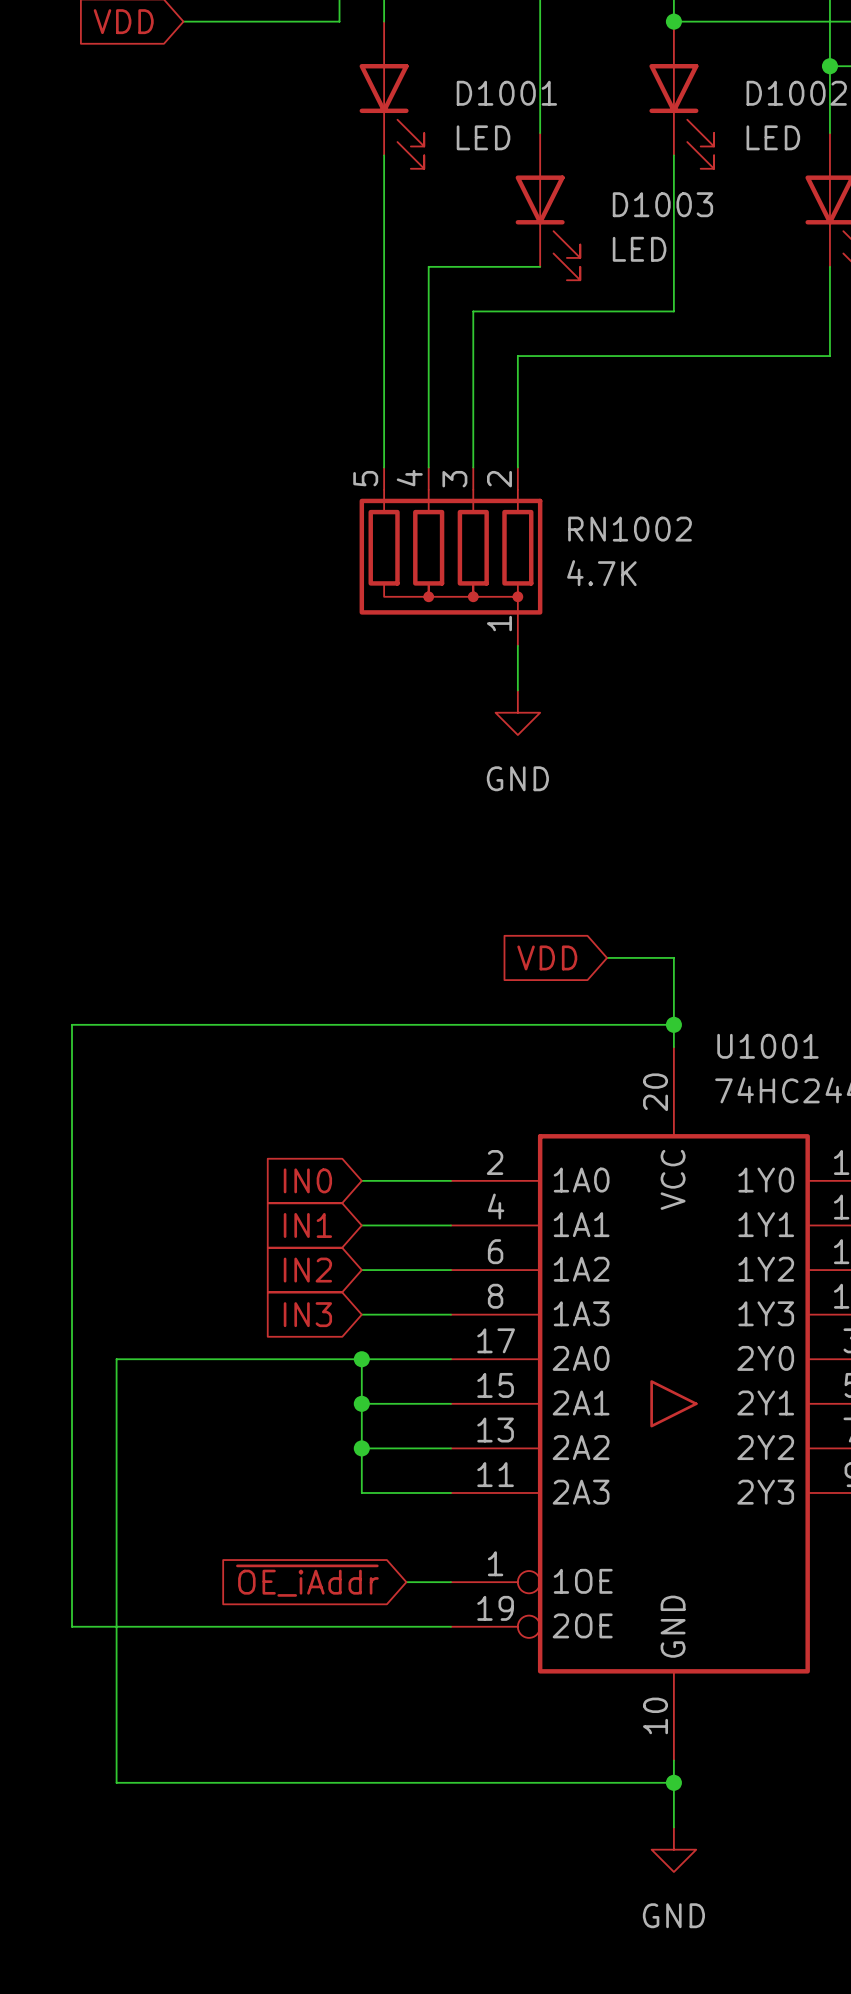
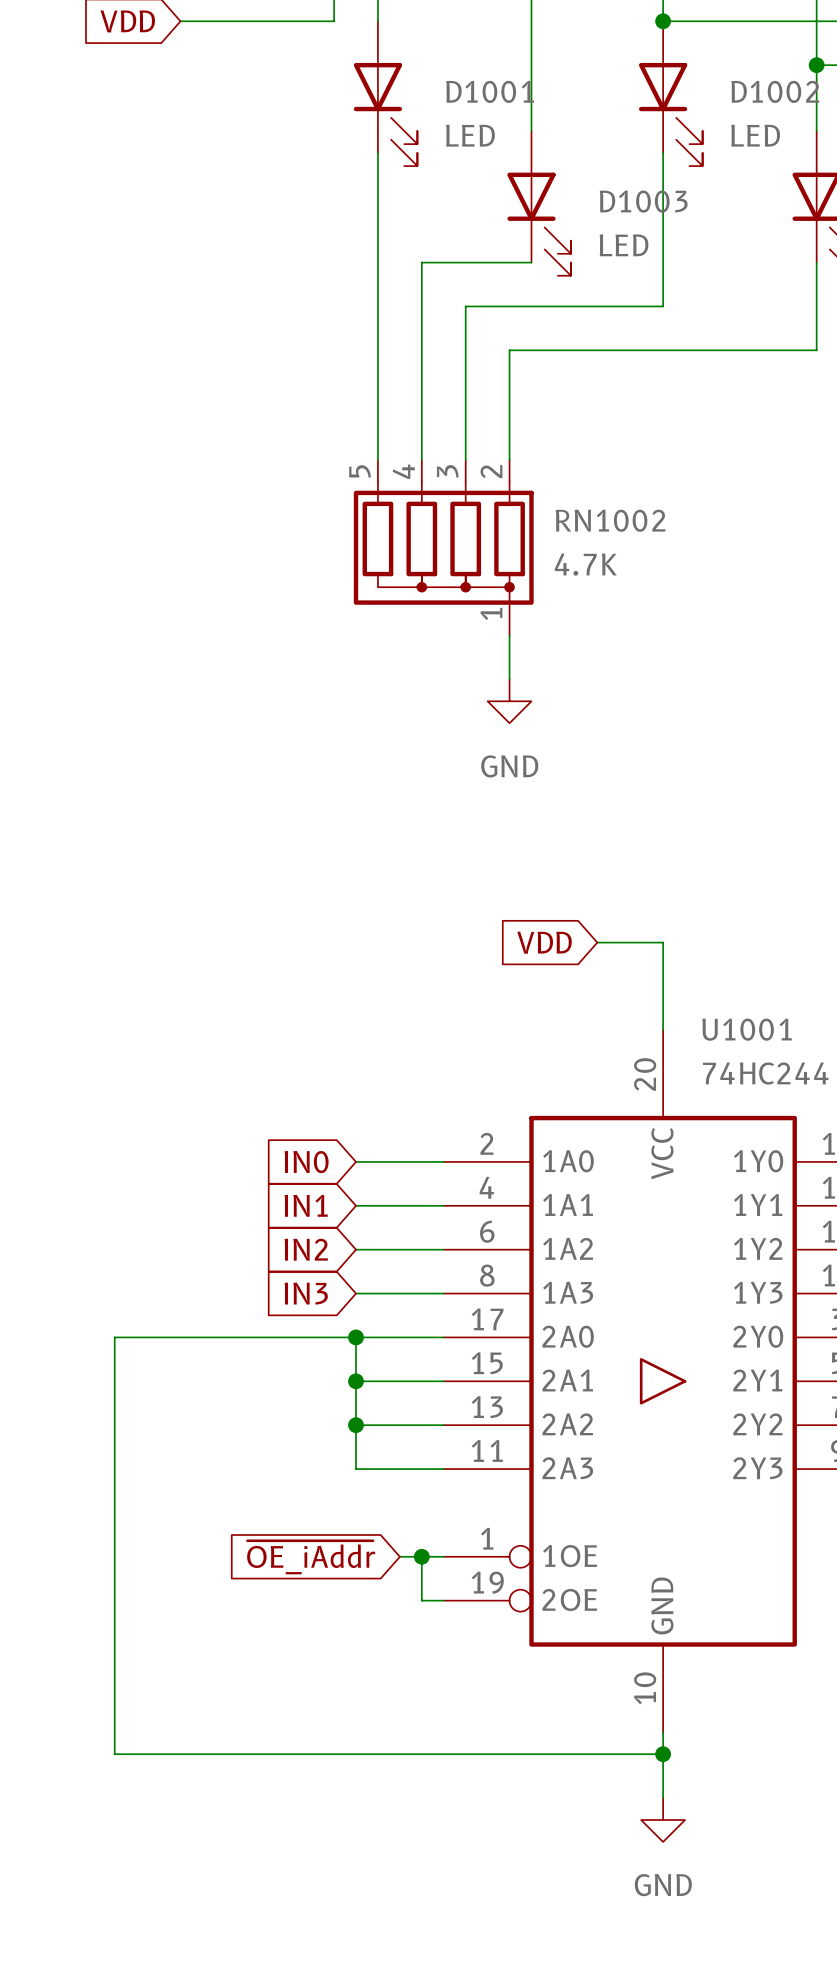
wire: (673, 1024) (72, 1024) (72, 1626) (428, 1626) -> (421, 1556) (421, 1600)
junction: (673, 1024) -> none
junction: none -> (421, 1556)

